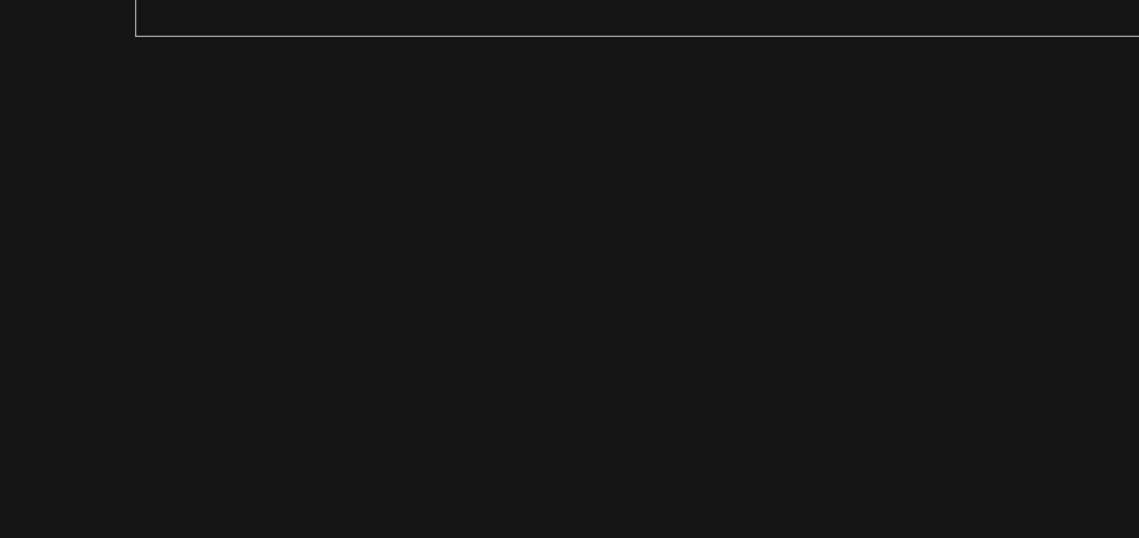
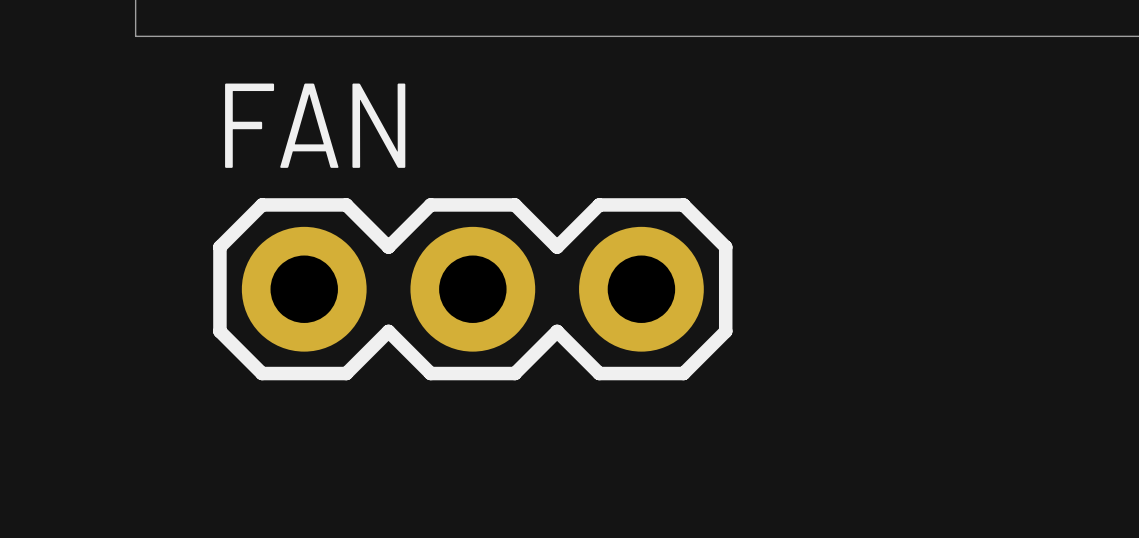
FAN: none -> (472, 289)

